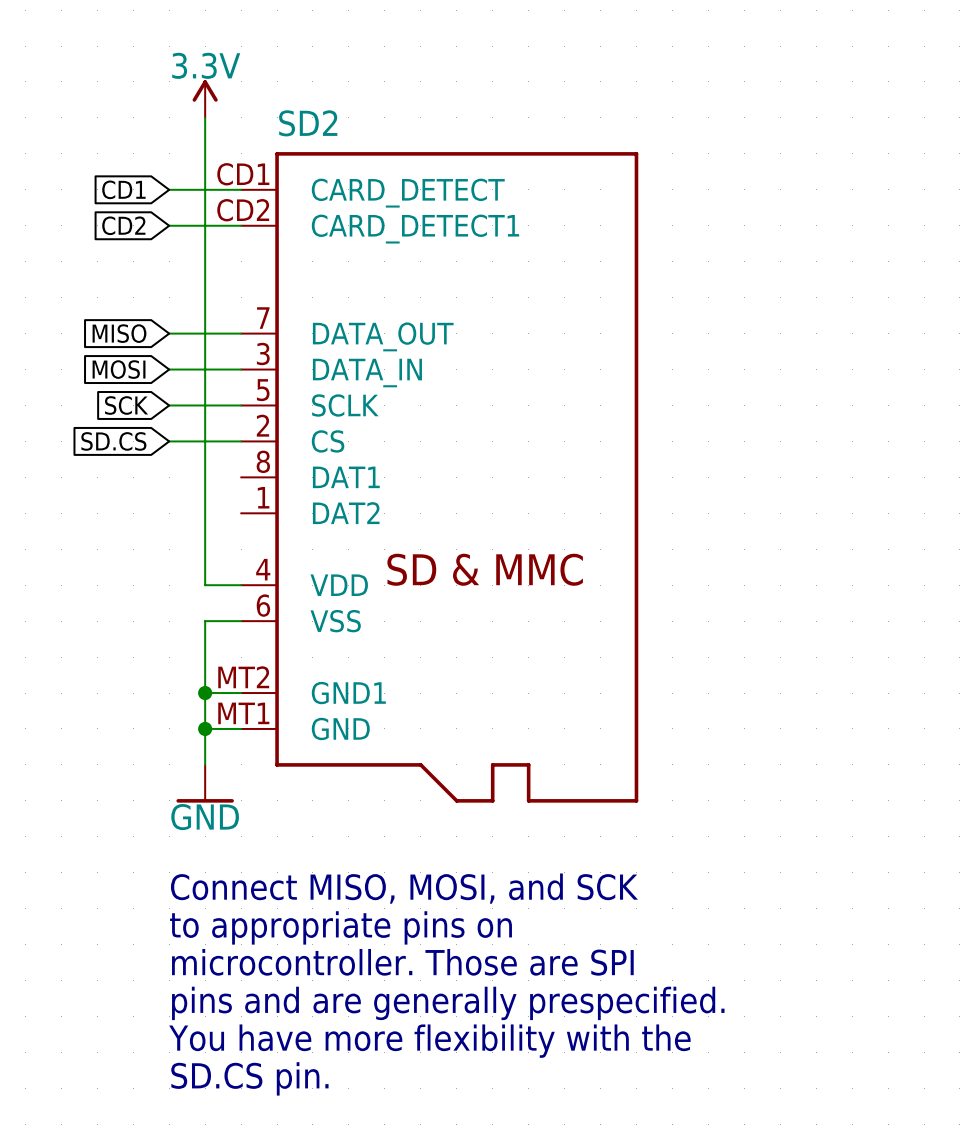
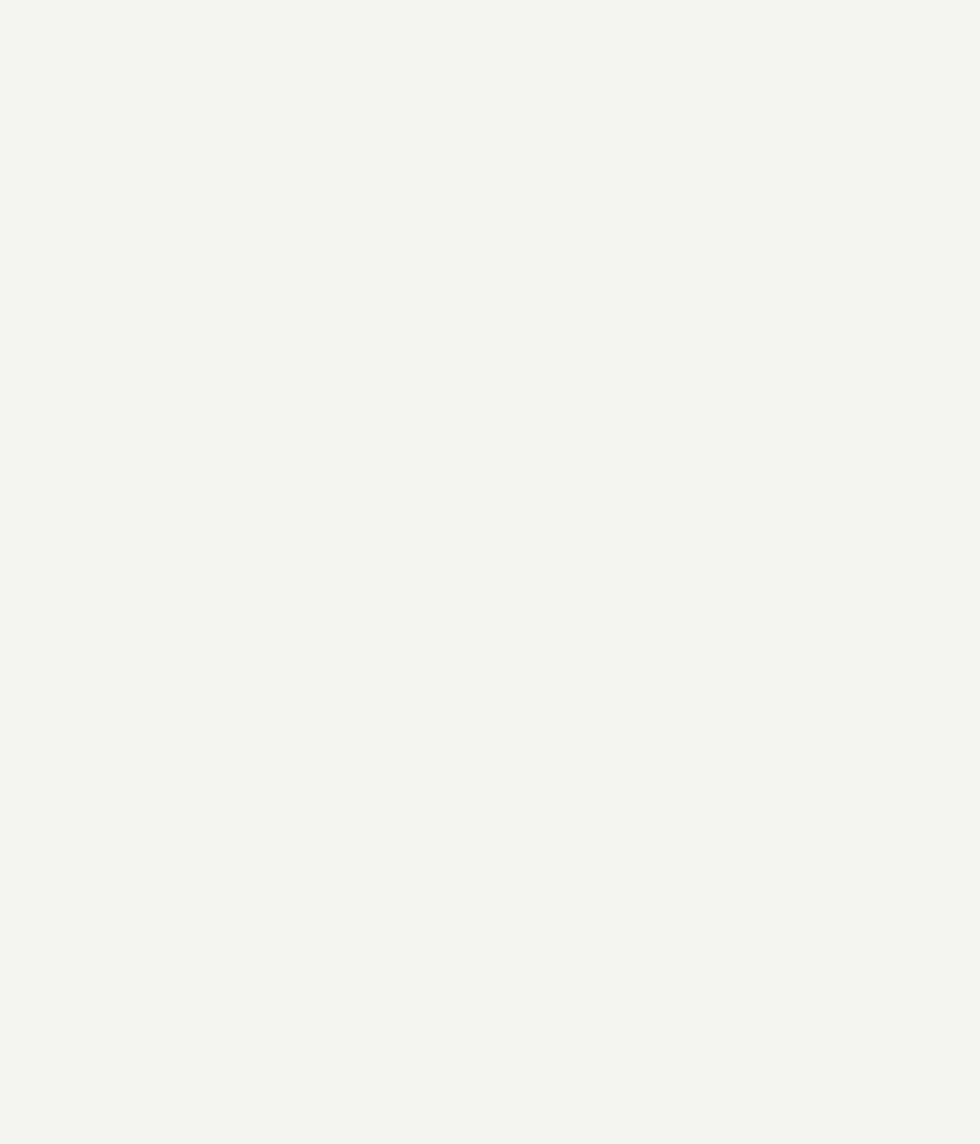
power symbol: 3.3V (205, 99) -> none
wire: (205, 117) (205, 585) (241, 585) -> none
global label: CD1 (123, 189) -> none
wire: (169, 189) (241, 189) -> none
global label: CD2 (123, 225) -> none
wire: (169, 225) (241, 225) -> none
global label: MISO (119, 333) -> none
wire: (169, 333) (241, 333) -> none
global label: MOSI (119, 369) -> none
wire: (169, 369) (241, 369) -> none
global label: SCK (126, 405) -> none
wire: (169, 405) (241, 405) -> none
global label: SD.CS (113, 441) -> none
wire: (169, 441) (241, 441) -> none
SD2: (439, 477) -> none
wire: (241, 621) (205, 621) (205, 764) -> none
wire: (205, 693) (241, 693) -> none
junction: (205, 693) -> none
wire: (205, 728) (241, 728) -> none
junction: (205, 728) -> none
power symbol: GND (205, 783) -> none
text: Connect MISO, MOSI, and SCK (404, 888) -> none
text: to appropriate pins on (341, 927) -> none
text: microcontroller. Those are SPI (402, 962) -> none
text: pins and are generally prespecified. (448, 1003) -> none
text: You have more flexibility with the (429, 1041) -> none
text: SD.CS pin. (249, 1078) -> none

